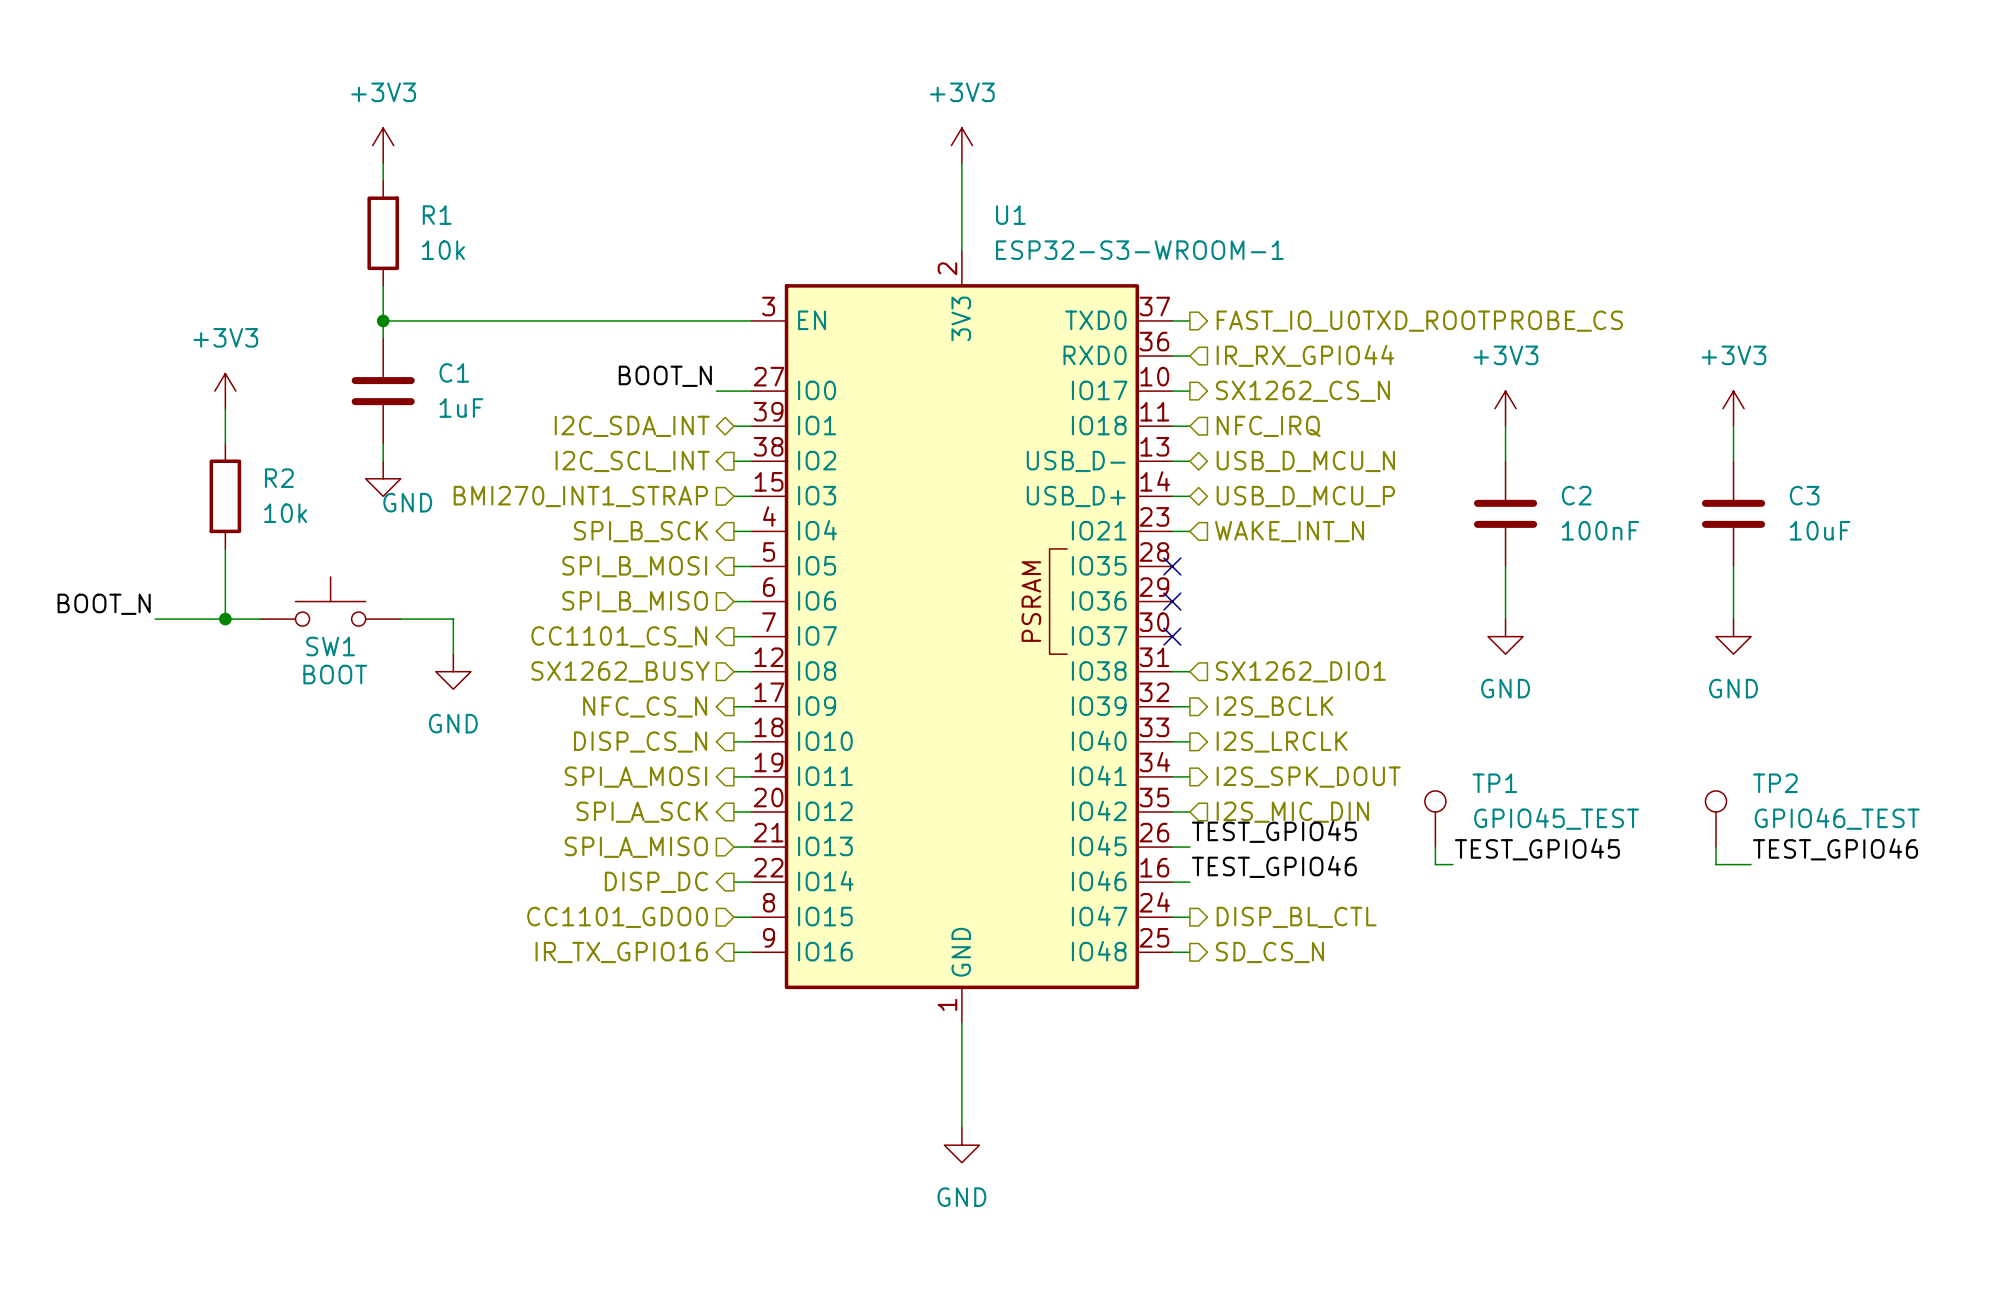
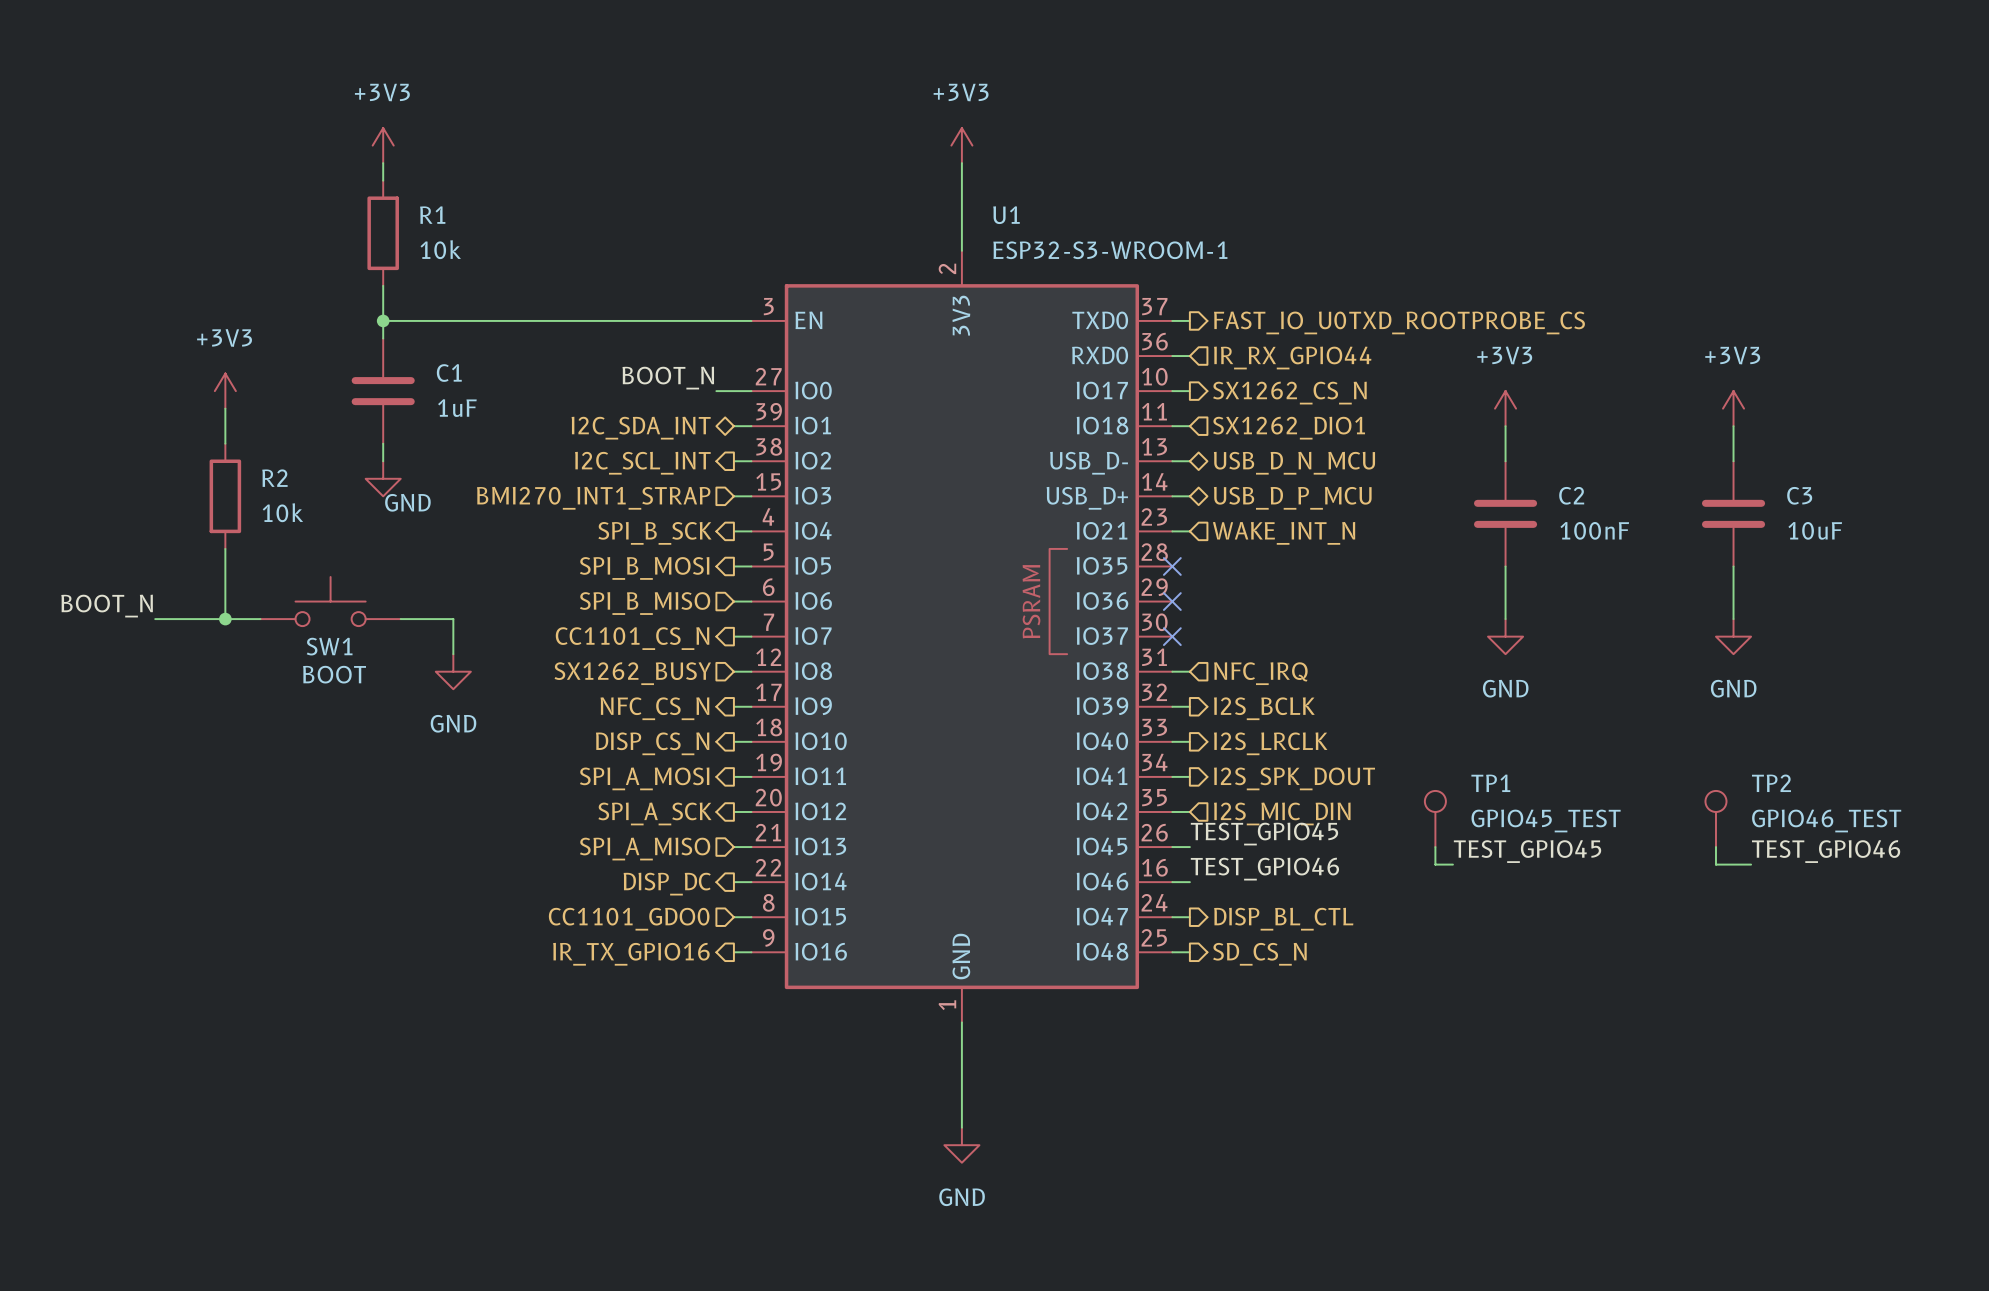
hierarchical label: NFC_IRQ (1268, 426) -> SX1262_DIO1 (1289, 428)
hierarchical label: USB_D_MCU_N (1305, 461) -> USB_D_N_MCU (1294, 463)
hierarchical label: USB_D_MCU_P (1305, 496) -> USB_D_P_MCU (1292, 498)
hierarchical label: SX1262_DIO1 (1300, 671) -> NFC_IRQ (1260, 673)

